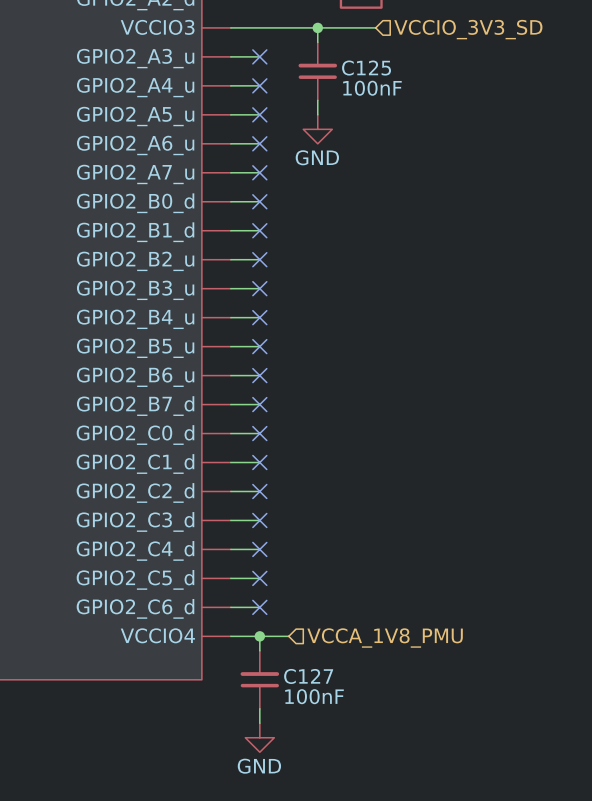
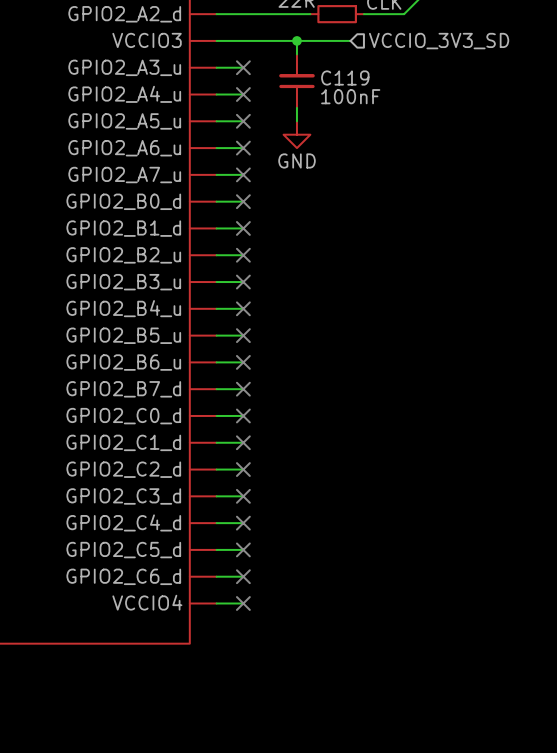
C125 name: C125 (366, 68) -> C119 (345, 78)
junction: (259, 636) -> none
no-connect mark: none -> (243, 603)
wire: (288, 636) (259, 636) (259, 650) -> none
hierarchical label: VCCA_1V8_PMU (385, 638) -> none
C127: 100nF (259, 679) -> none
wire: (259, 708) (259, 723) -> none
power symbol: GND (259, 737) -> none

